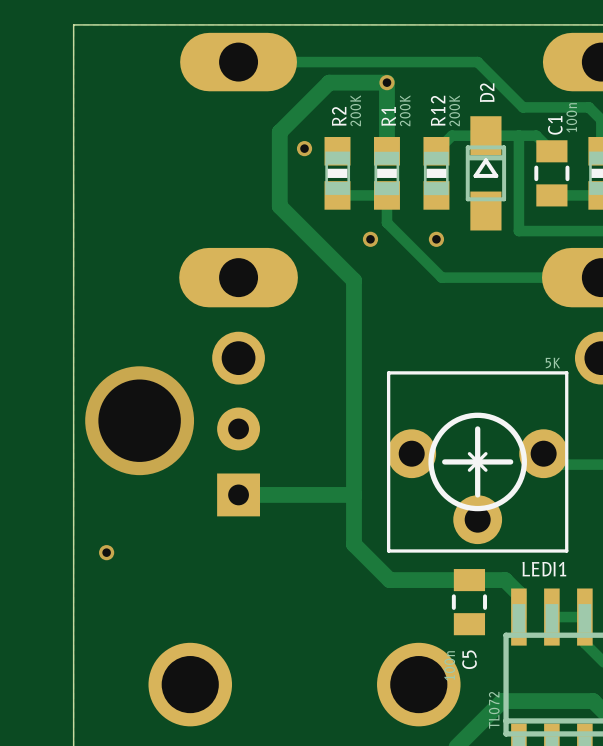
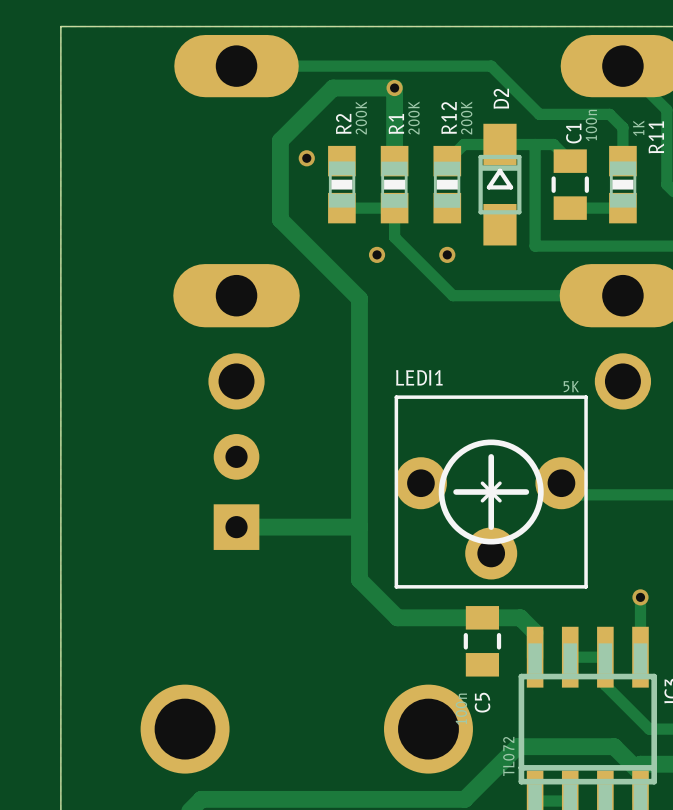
via: (139, 420) -> none
via: (106, 552) -> none
LEDI1 name position: LEDI1 (544, 569) -> LEDI1 (419, 377)

